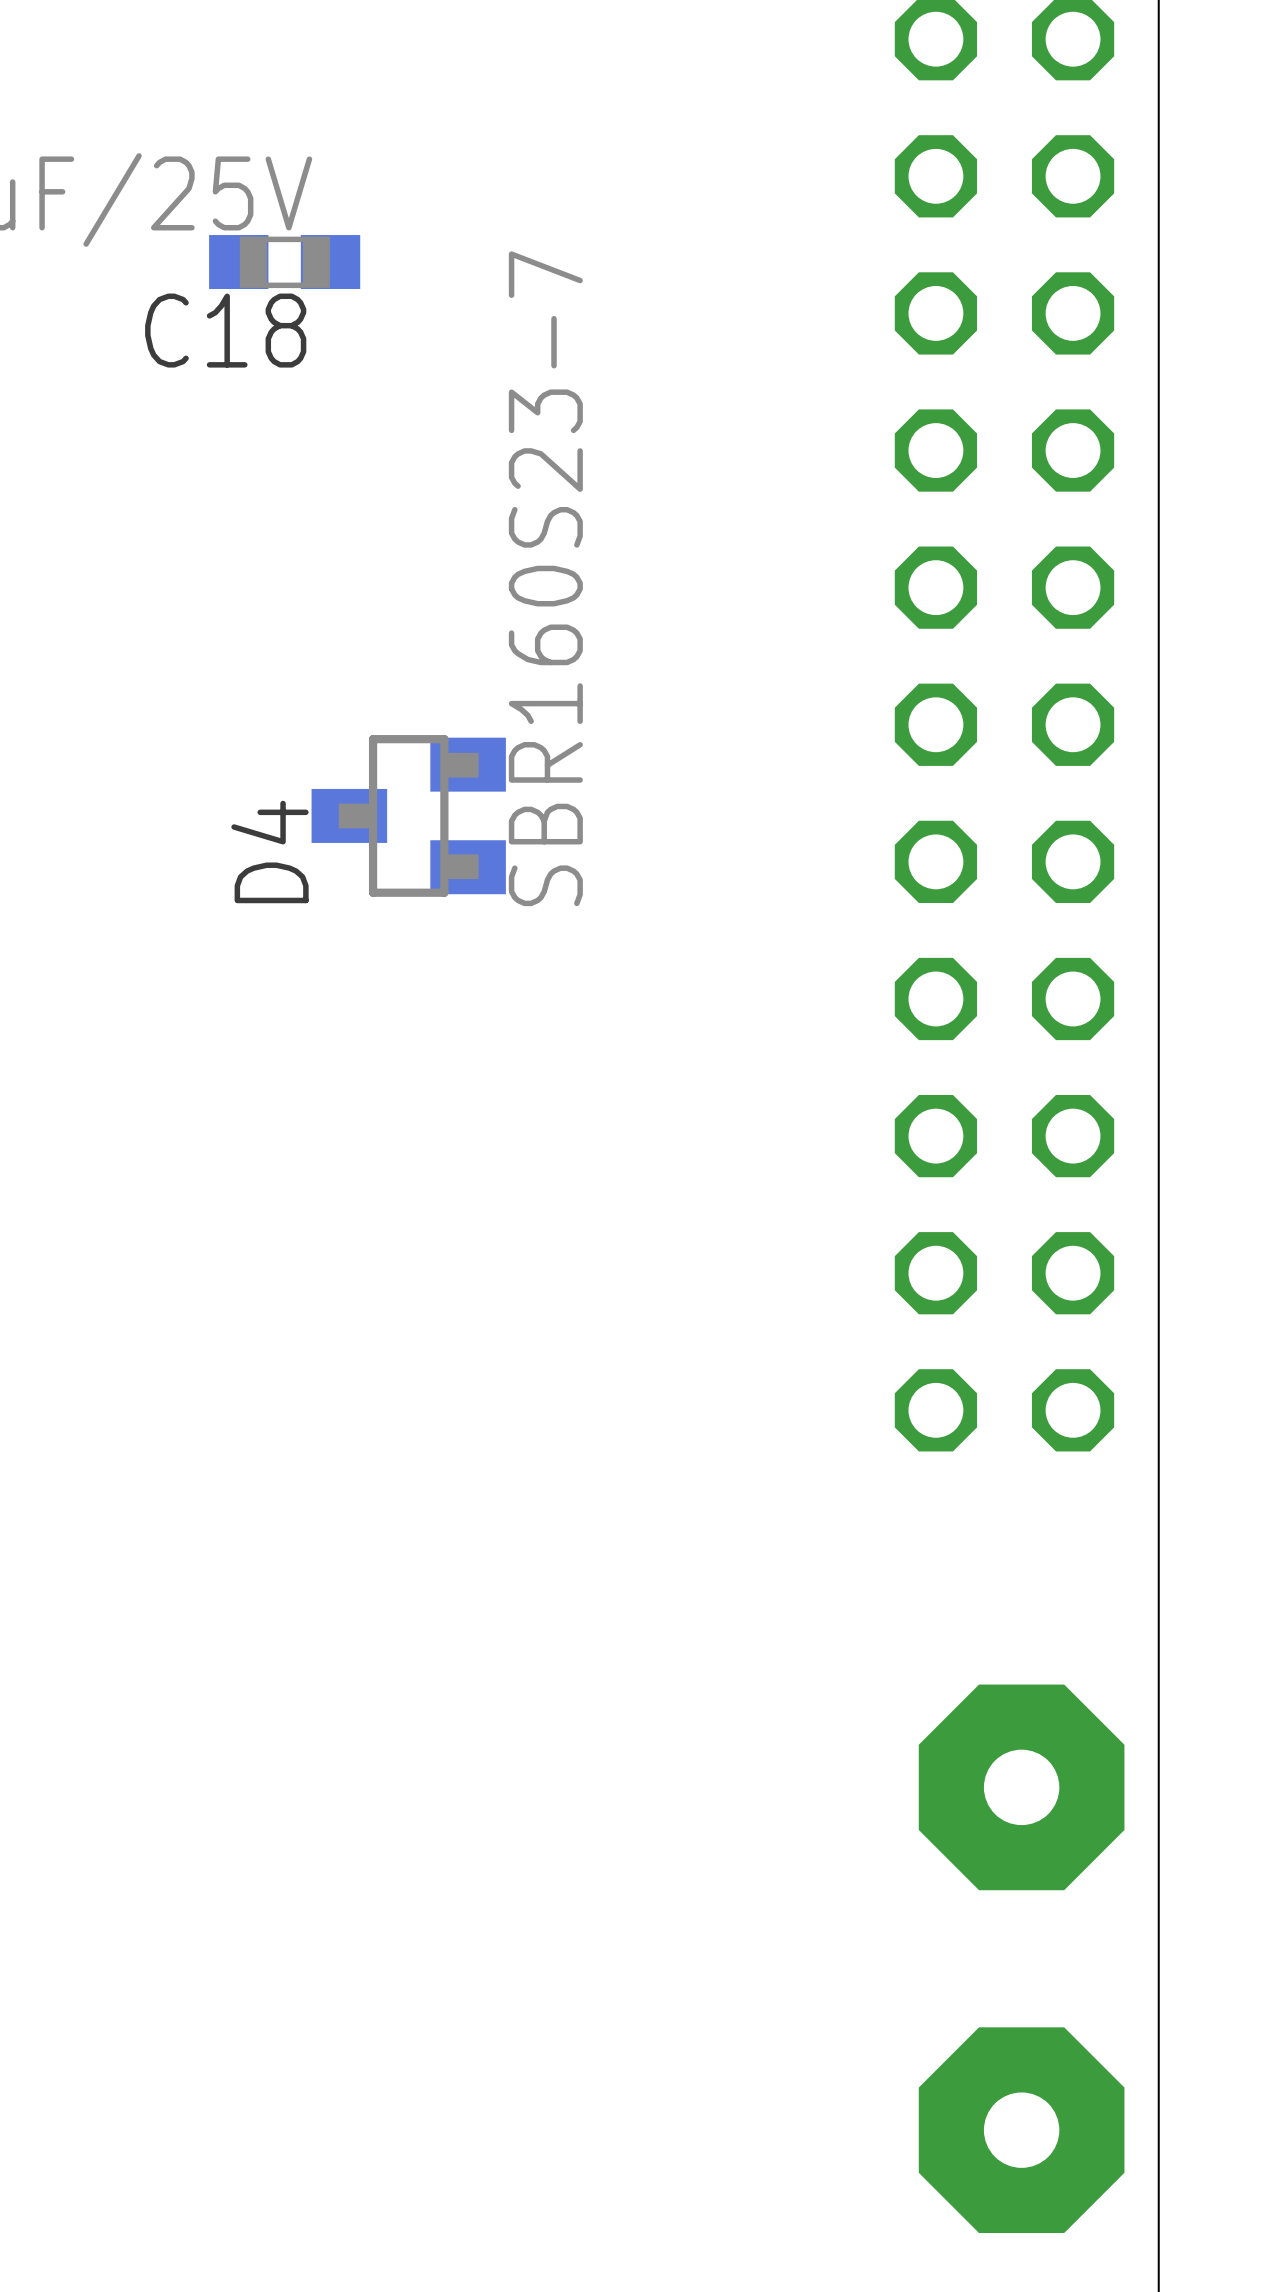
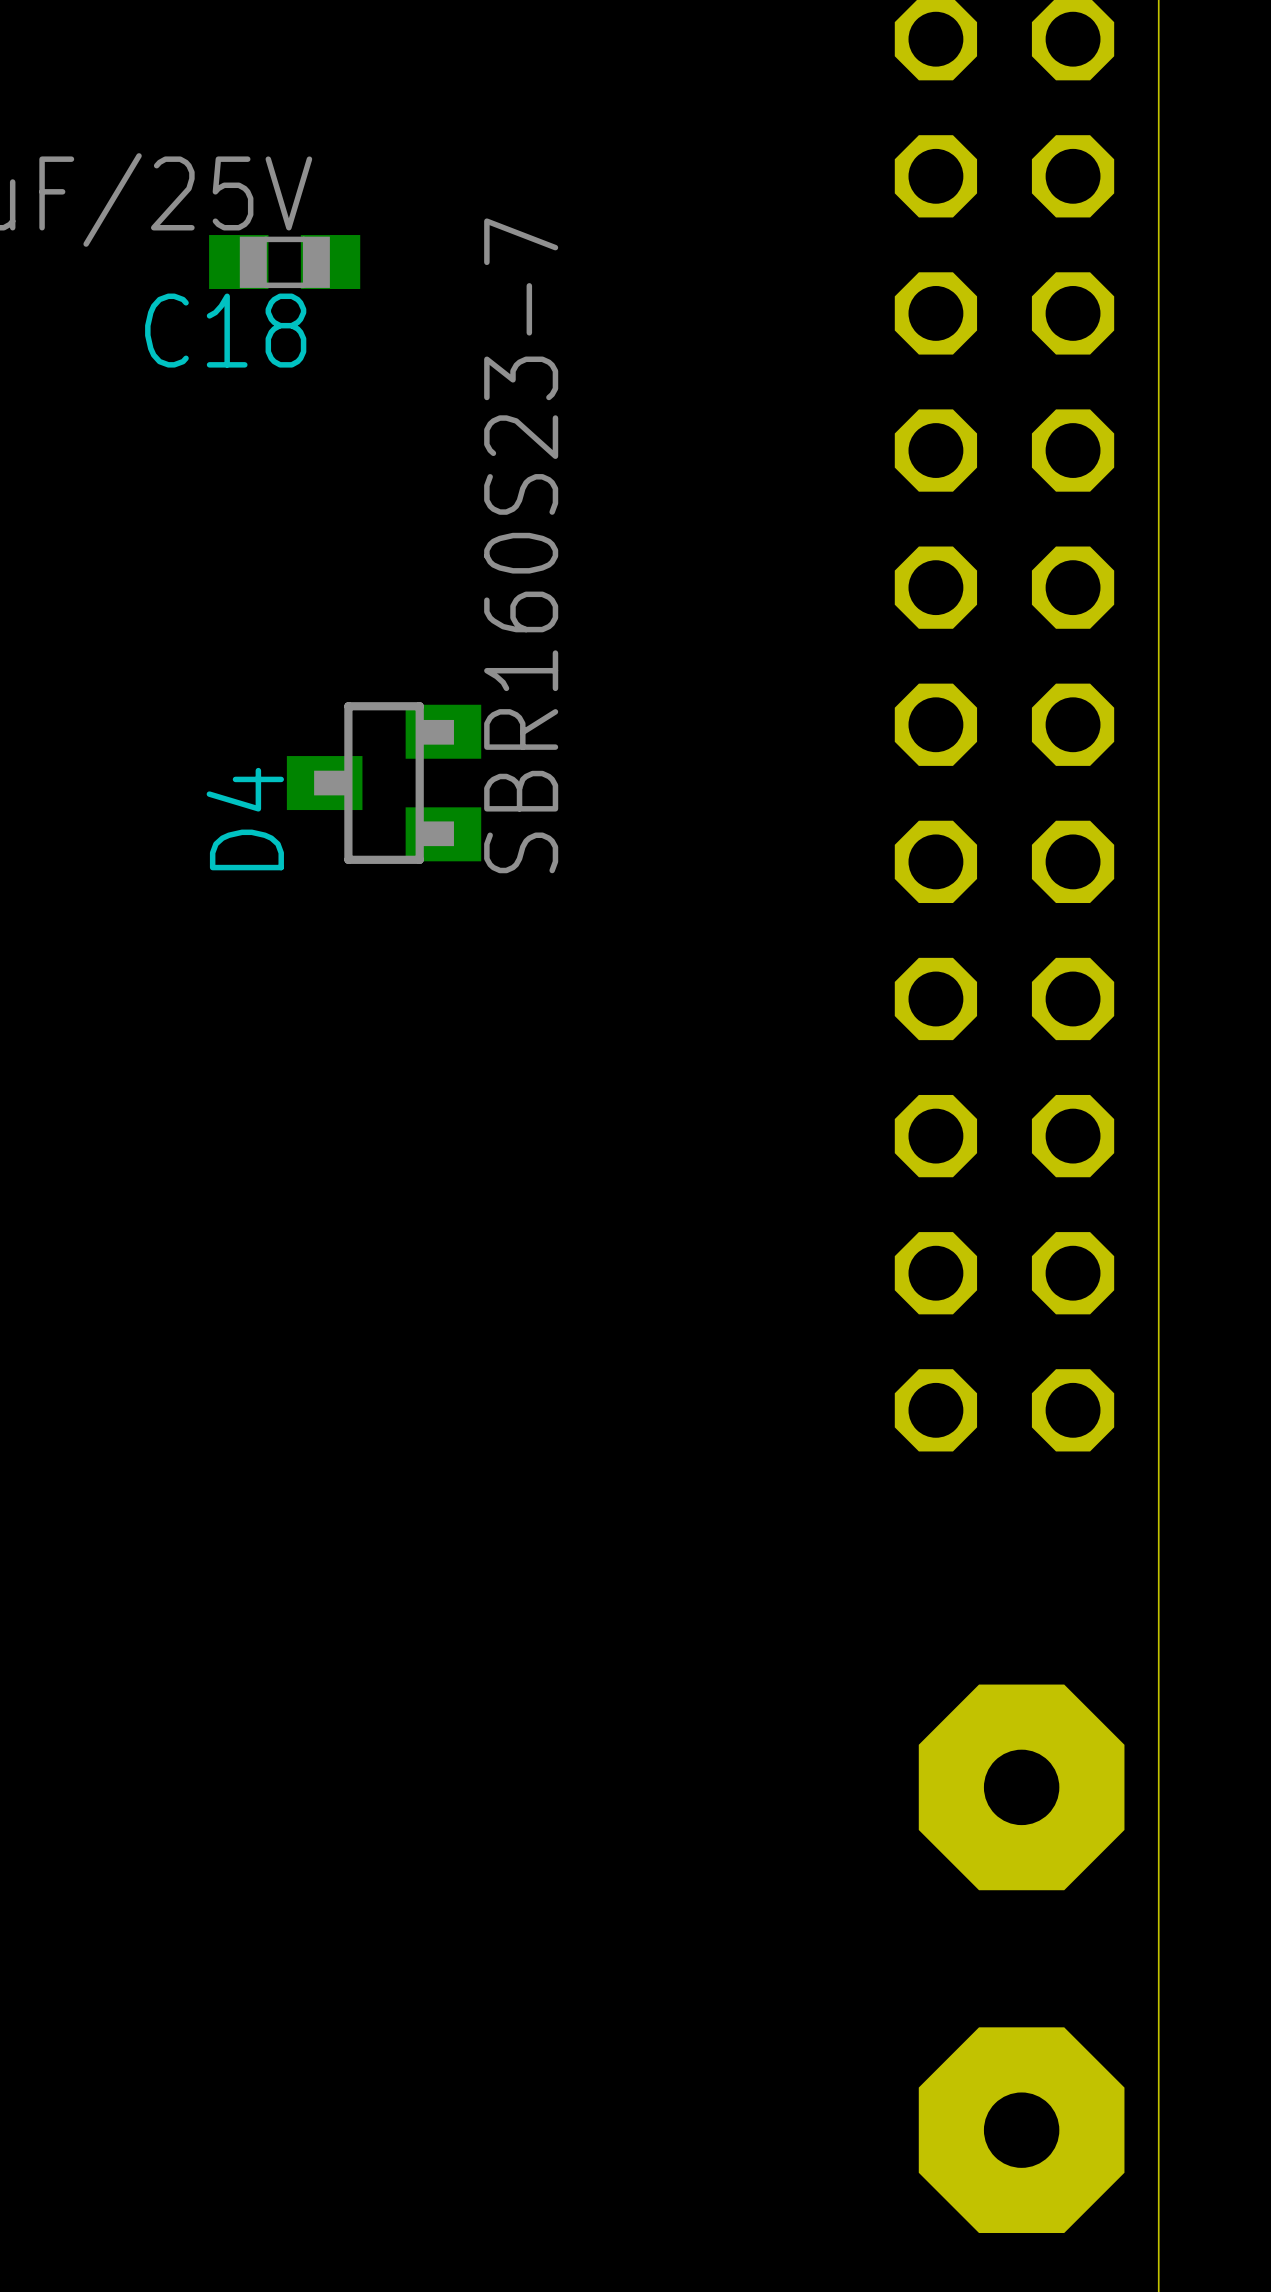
D4 position: (408, 815) -> (384, 783)

